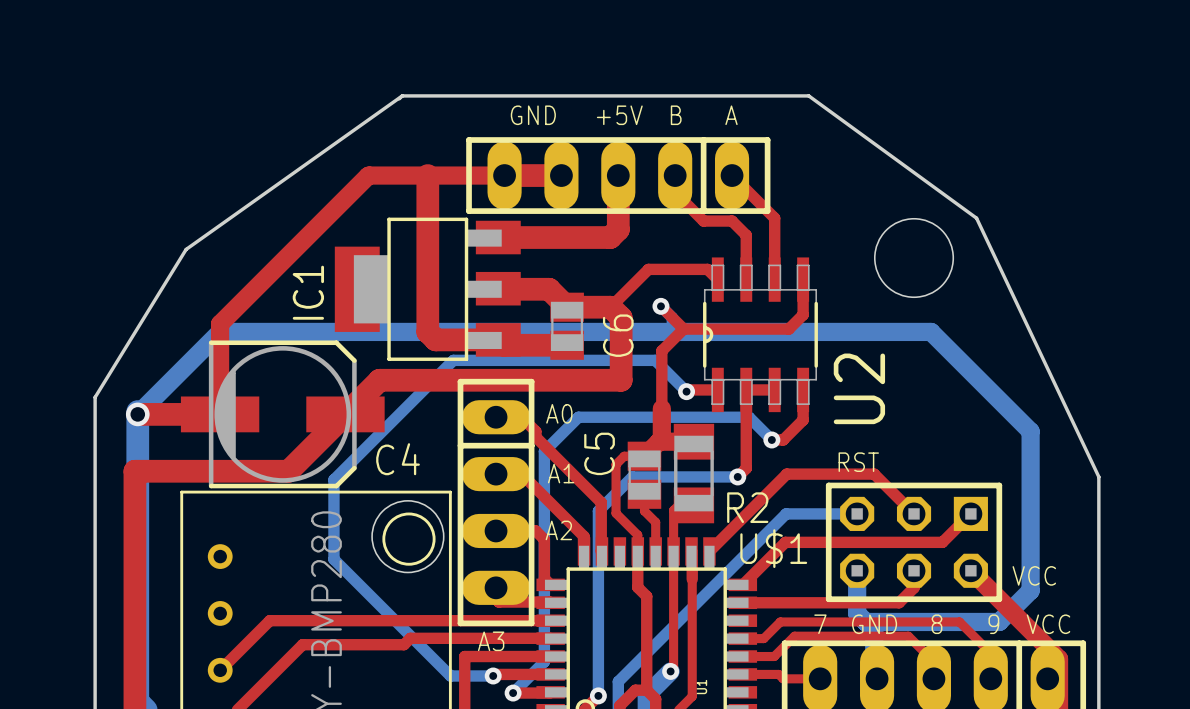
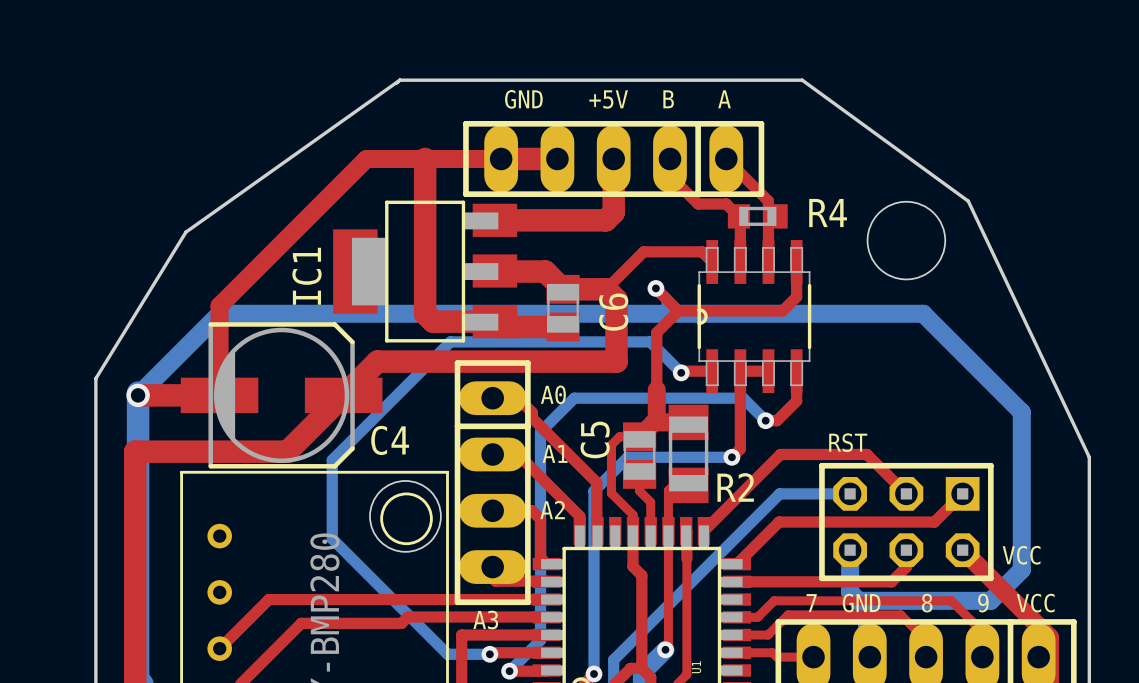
R4: none -> (757, 216)
U2 name: U2 (859, 388) -> none
U$1 name: U$1 (773, 548) -> none

